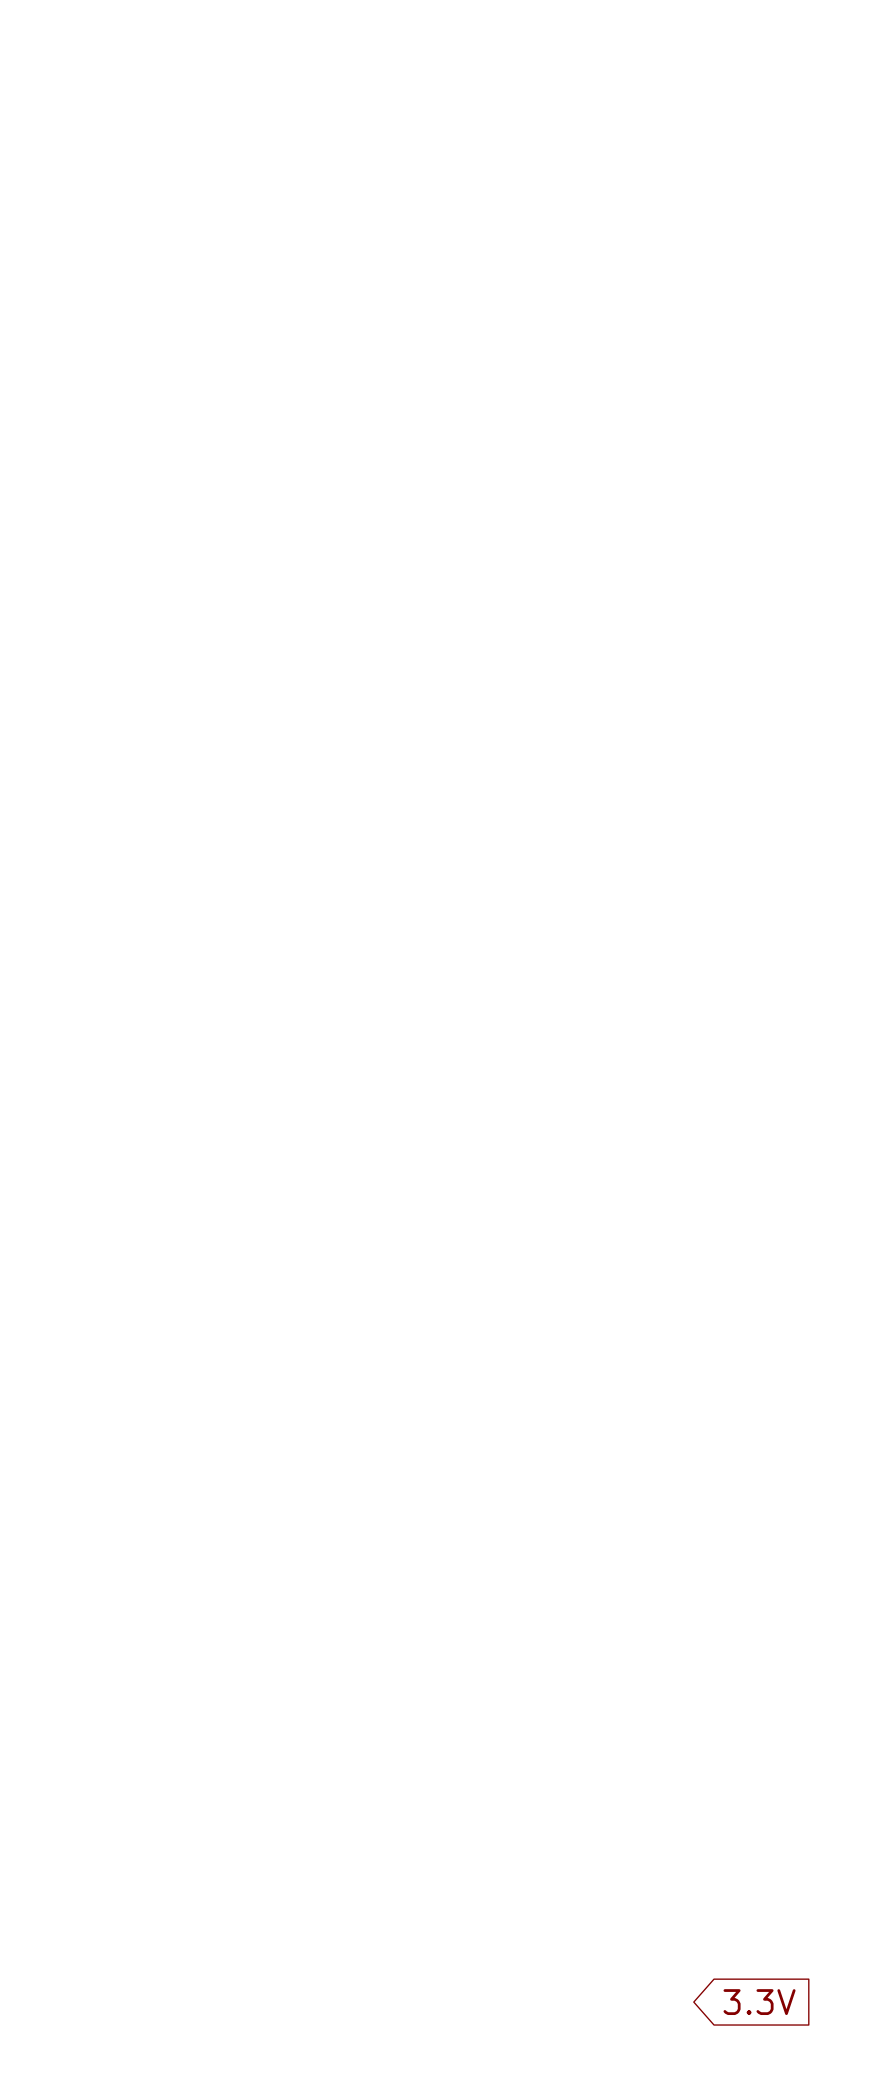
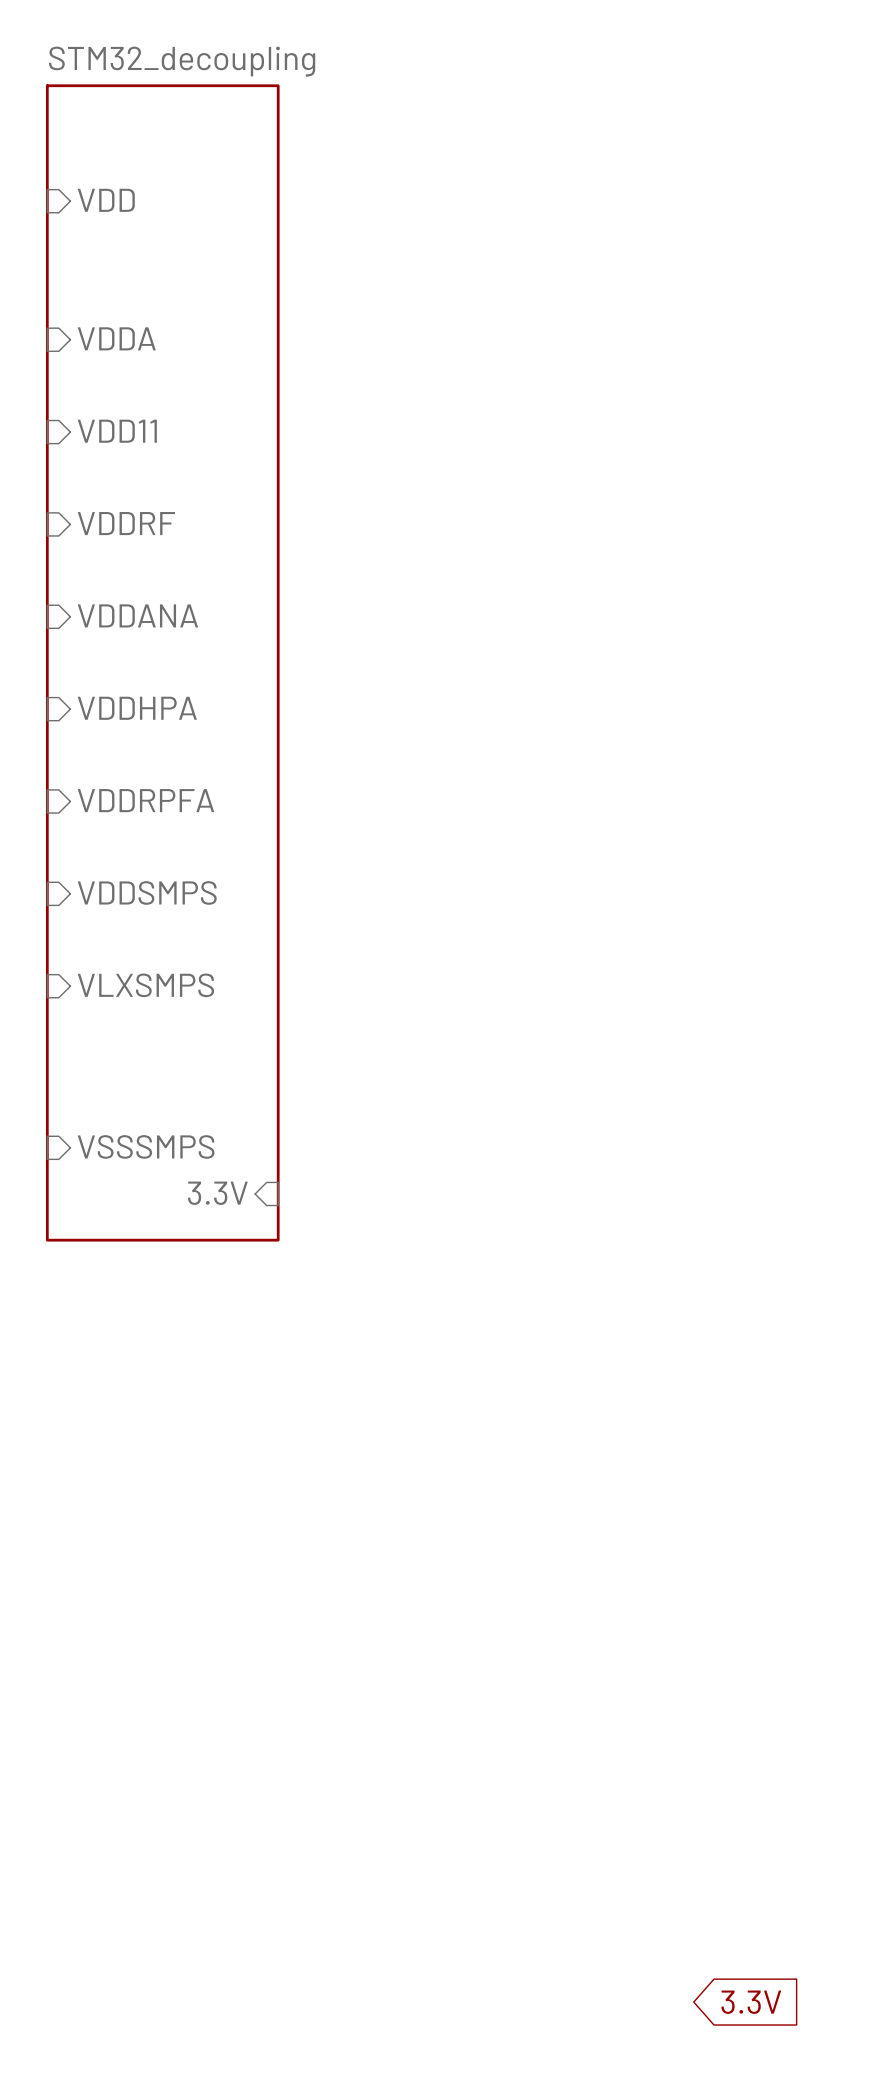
sheet pin: none -> VDD (106, 200)
sheet pin: none -> VDDA (116, 338)
sheet pin: none -> VDD11 (117, 431)
sheet pin: none -> VDDRF (126, 523)
sheet pin: none -> VDDANA (137, 615)
sheet STM32_decoupling: none -> (162, 662)
sheet pin: none -> VDDHPA (137, 708)
sheet pin: none -> VDDRPFA (145, 800)
sheet pin: none -> VDDSMPS (147, 892)
sheet pin: none -> VLXSMPS (145, 985)
sheet pin: none -> VSSSMPS (146, 1146)
sheet pin: none -> 3.3V (217, 1193)

